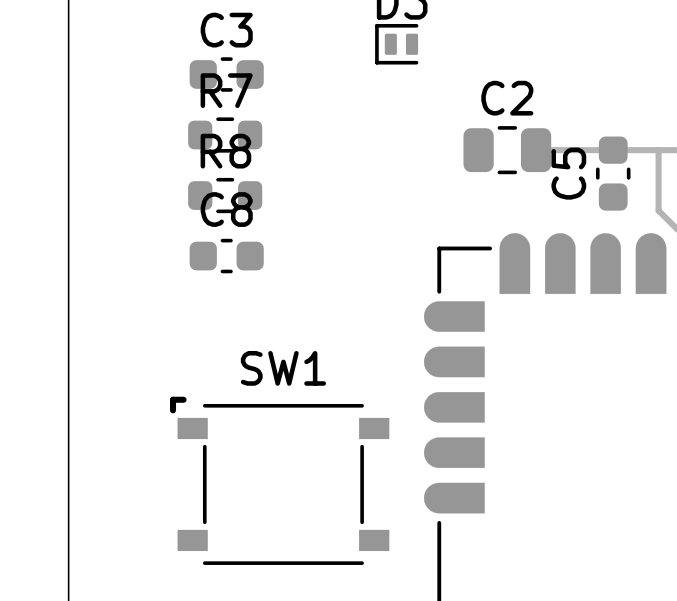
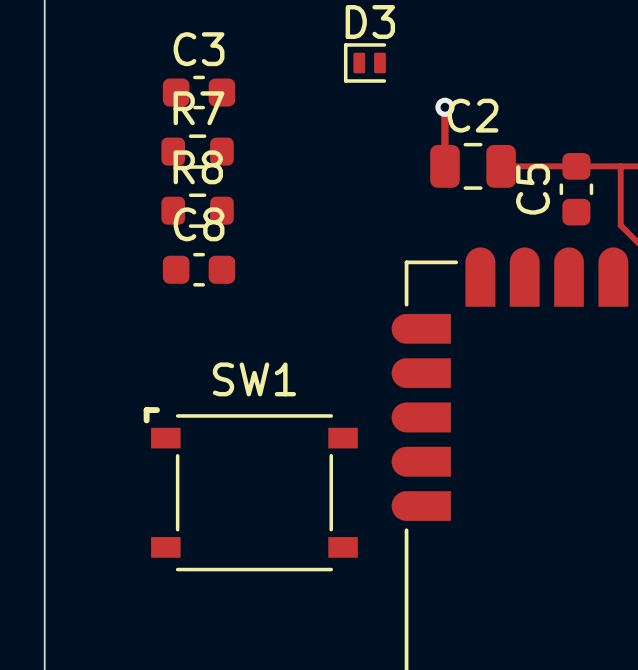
track: none -> (444, 107) (444, 166)
via: none -> (444, 107)

